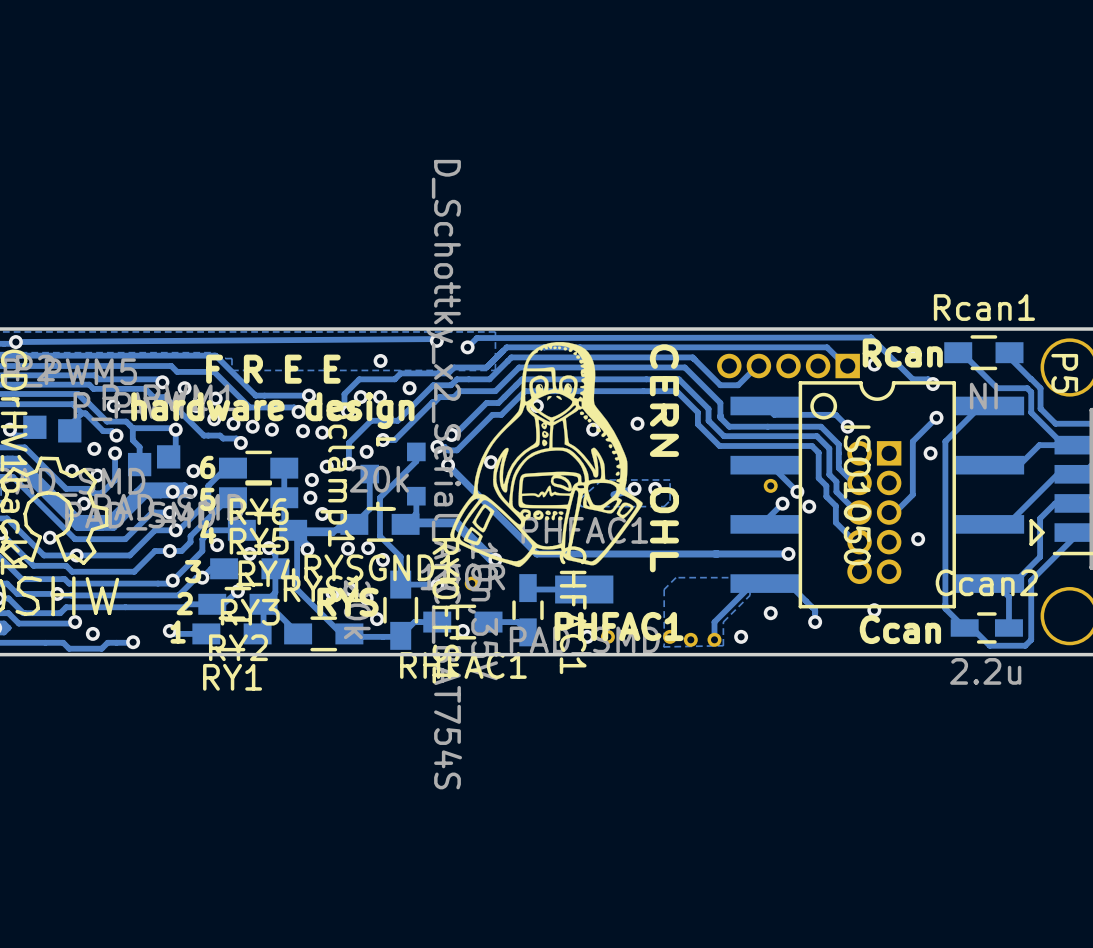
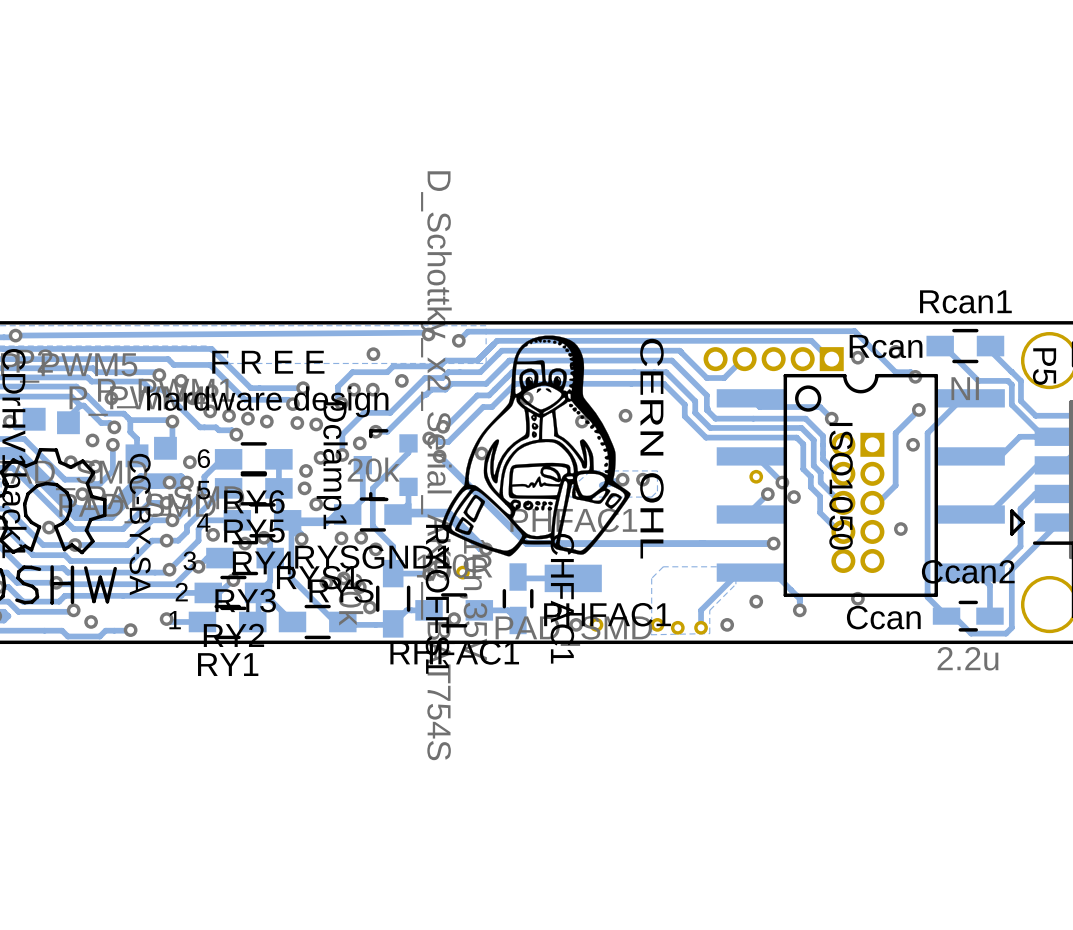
text: none -> CC-BY-SA (140, 524)

